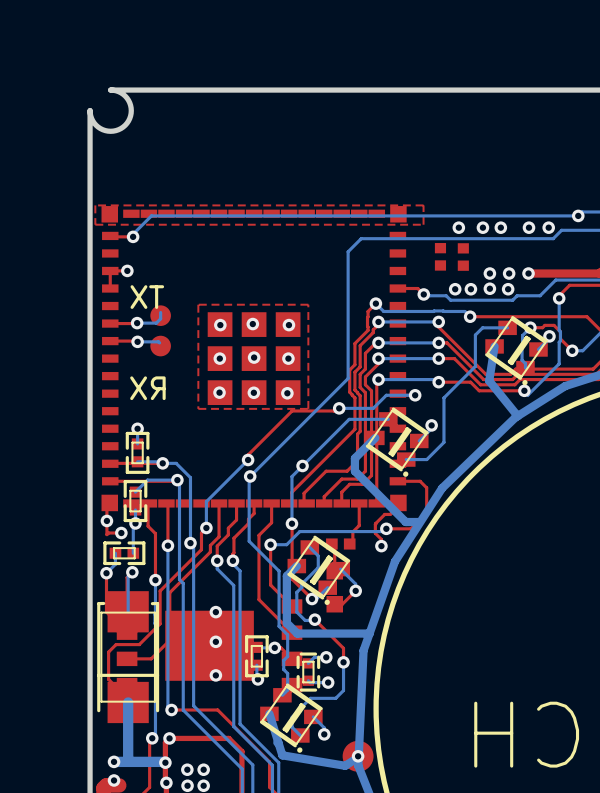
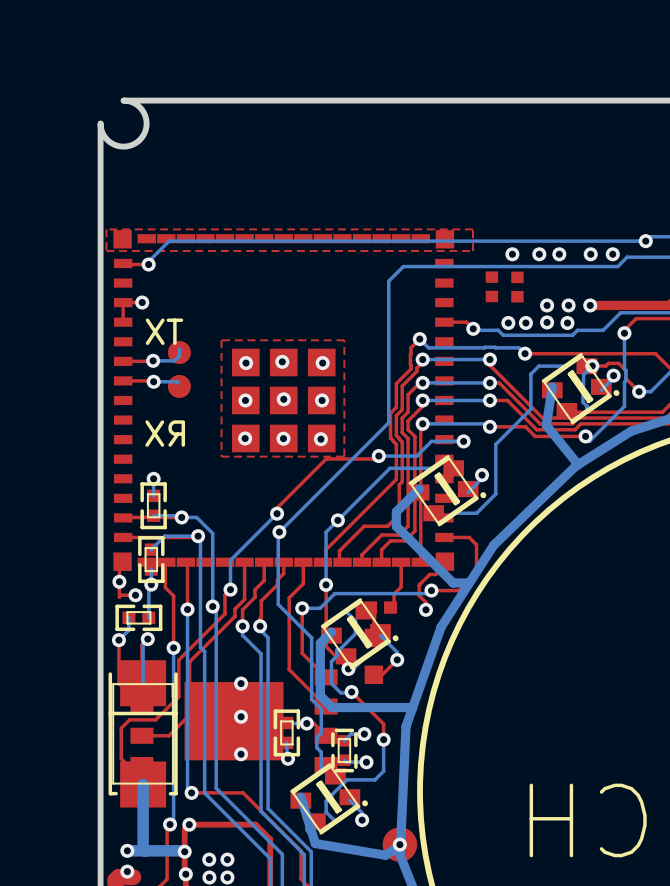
part footprint: [485, 315, 549, 386] -> [541, 352, 620, 425]
part footprint: [365, 407, 429, 477] -> [408, 455, 487, 527]
part footprint: [287, 535, 351, 606] -> [320, 598, 399, 670]
part rotation: 0° (128, 657) -> 180° (143, 733)
part footprint: [259, 683, 323, 753] -> [290, 763, 369, 835]

